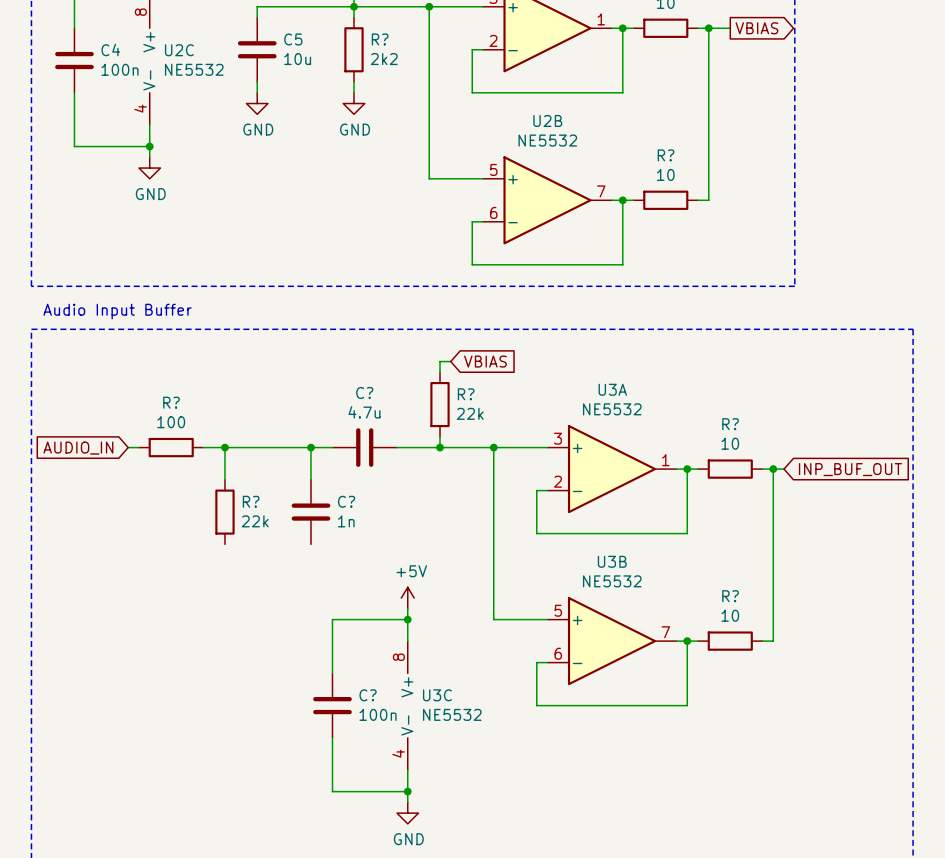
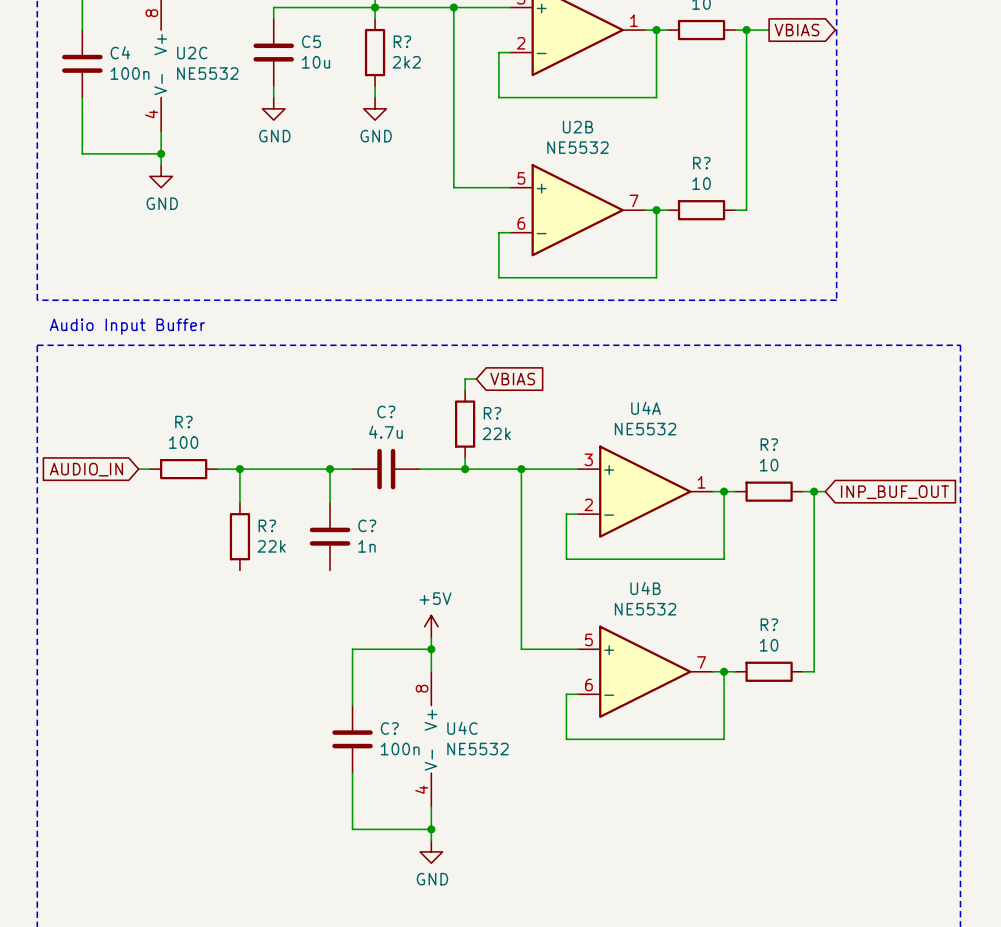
U3A name: U3A (612, 389) -> U4A (646, 408)
U3B name: U3B (612, 561) -> U4B (645, 588)
U3C name: U3C (437, 695) -> U4C (462, 728)

